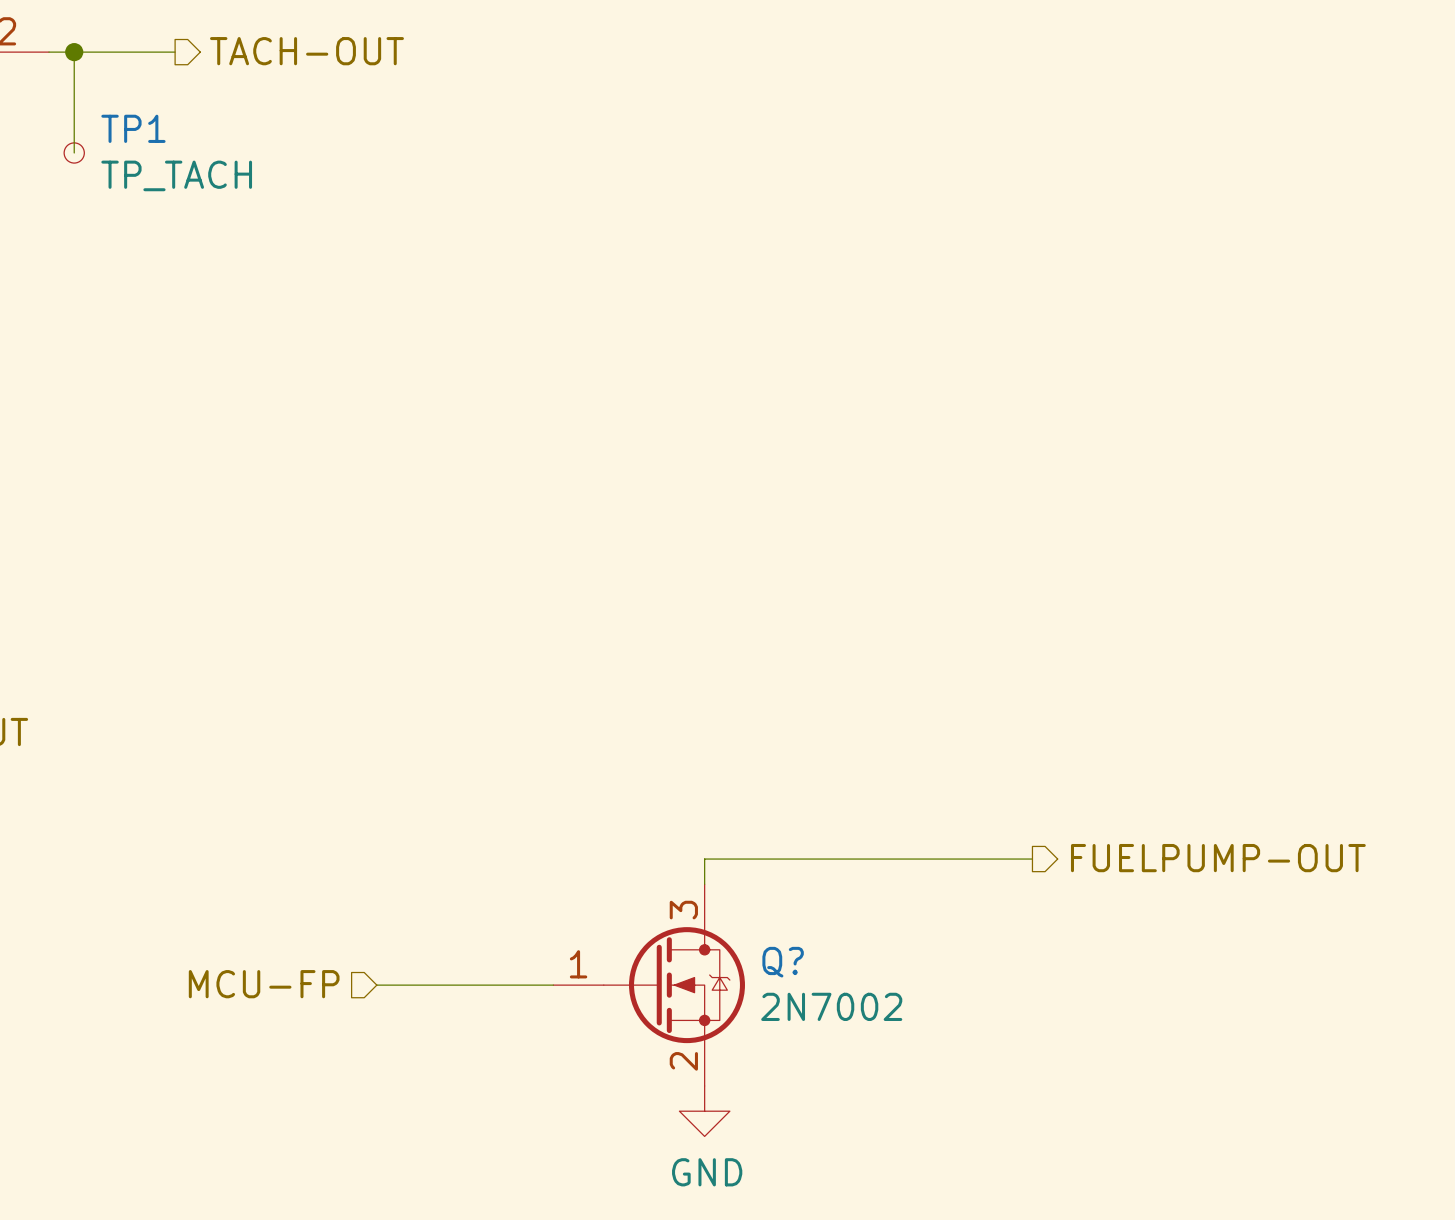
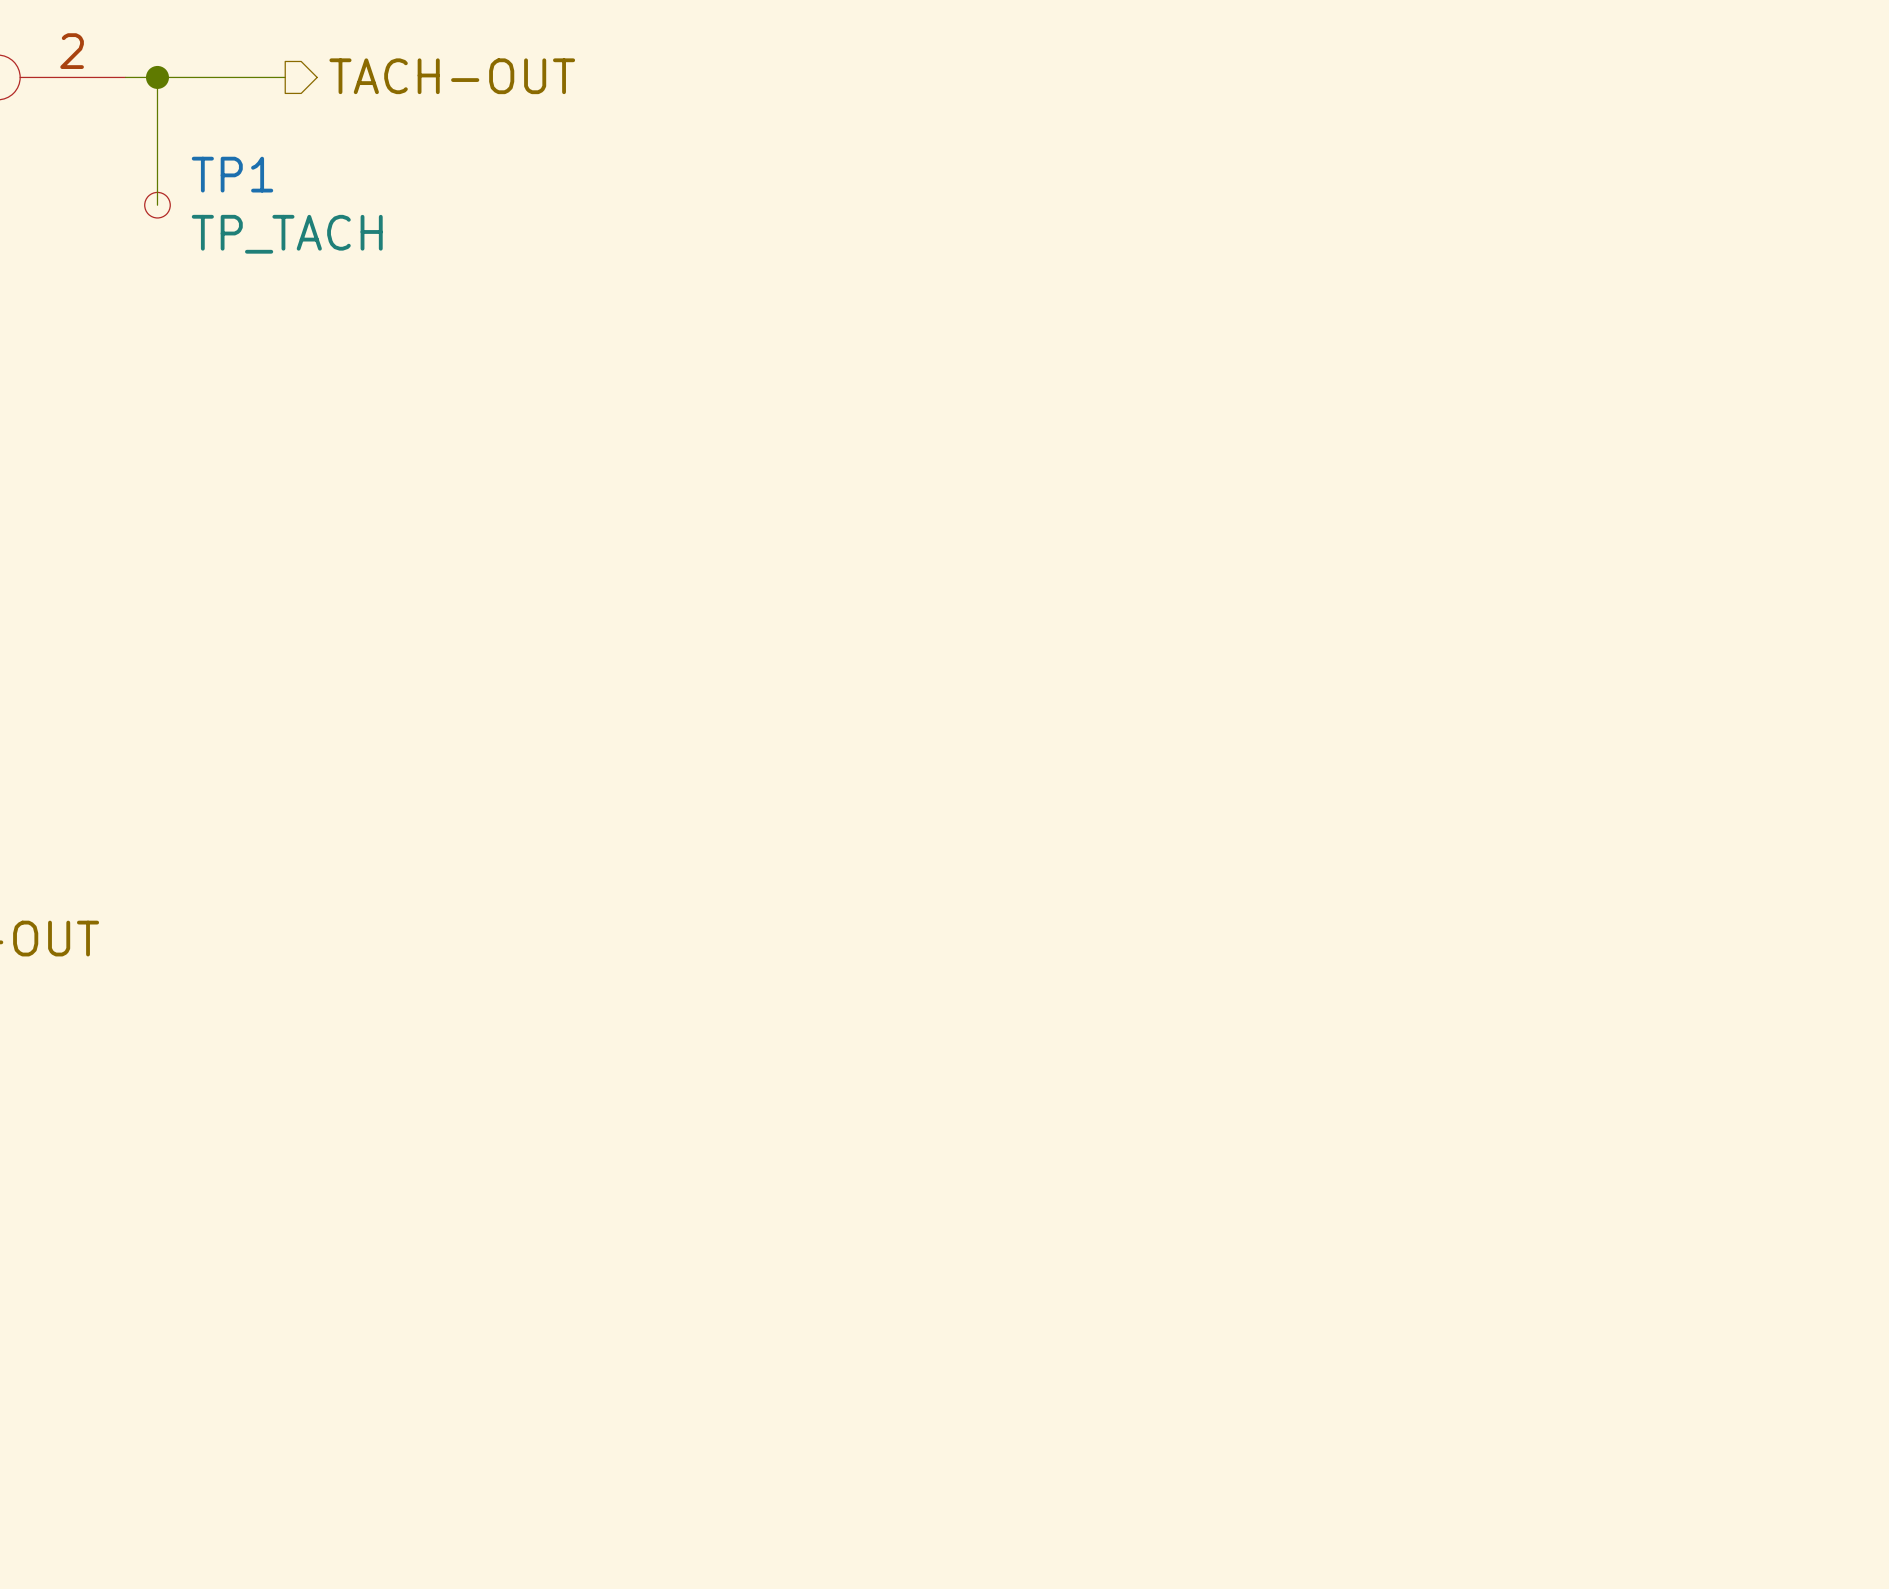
hierarchical label: FUELPUMP-OUT (1218, 858) -> none
wire: (1032, 859) (704, 859) (704, 884) -> none
hierarchical label: MCU-FP (264, 984) -> none
wire: (376, 985) (553, 985) -> none
Q?: 2N7002 (649, 985) -> none
power symbol: GND (704, 1111) -> none

